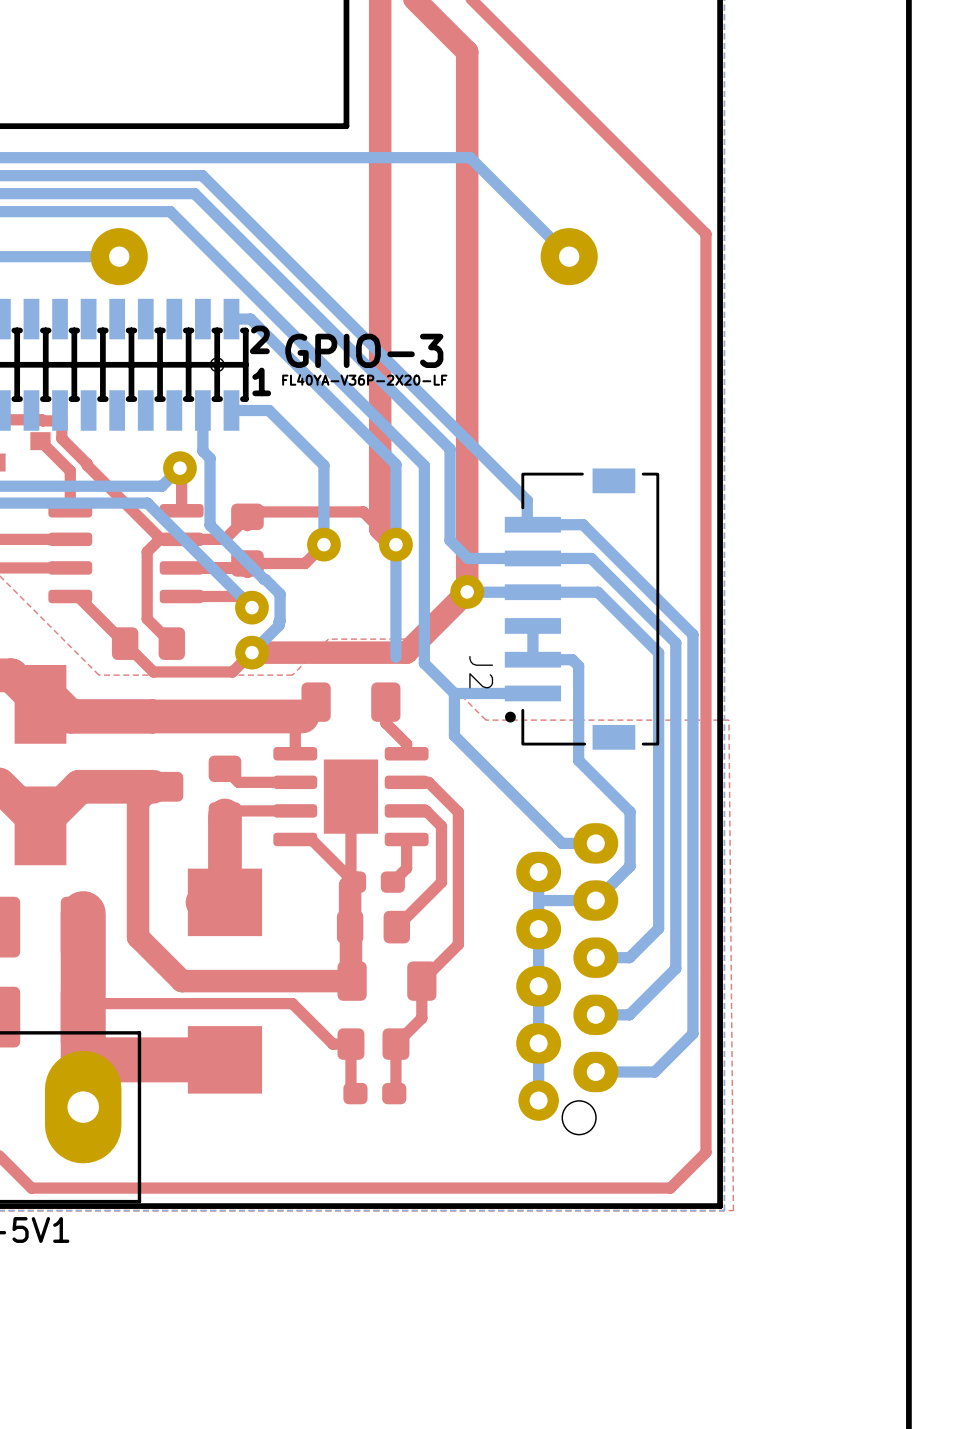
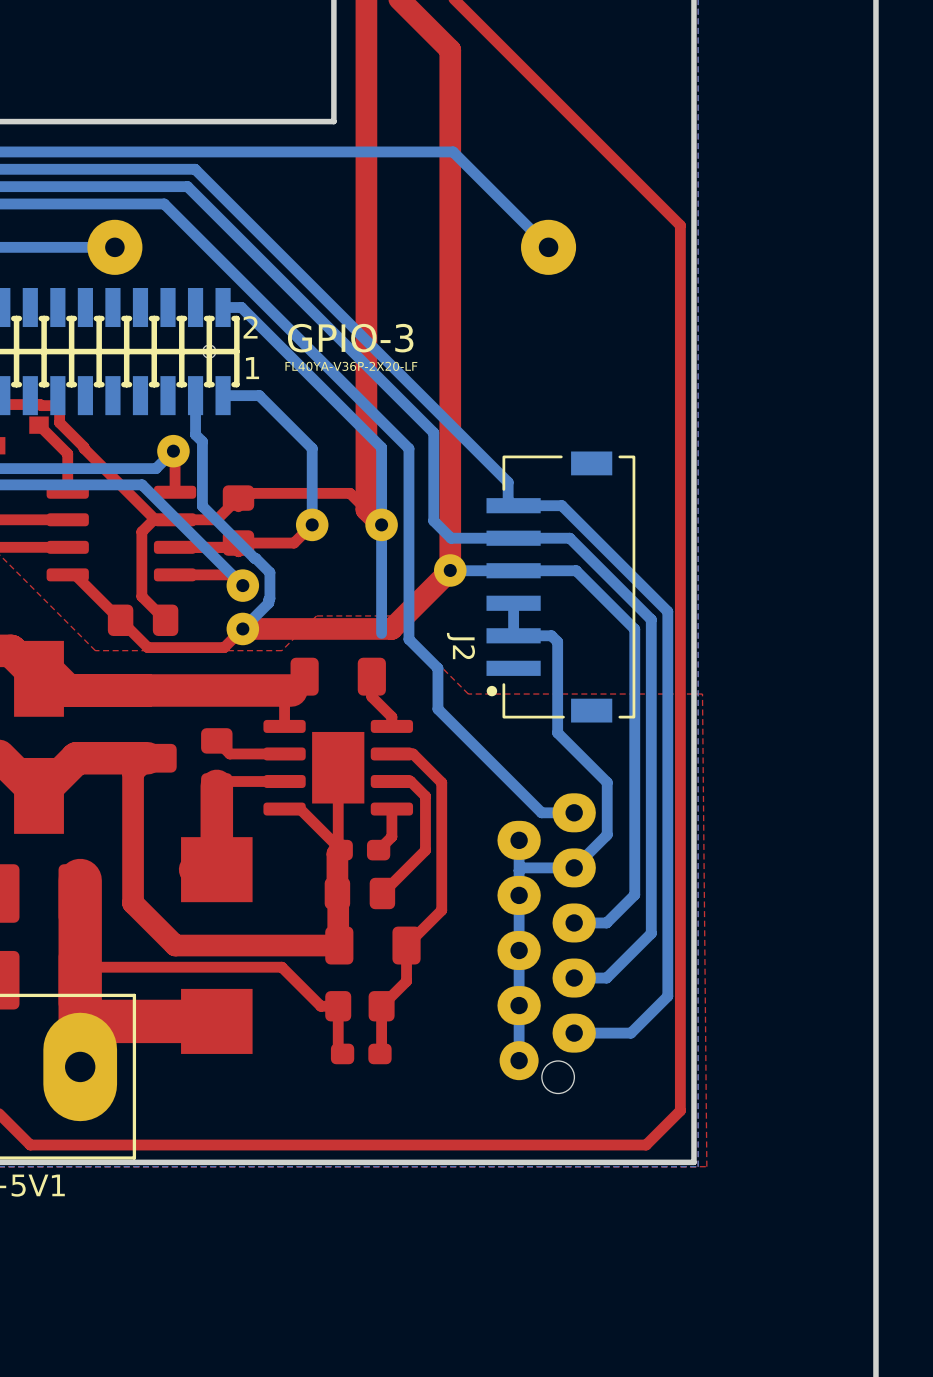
bottom track: (532, 693) (454, 693) -> none

